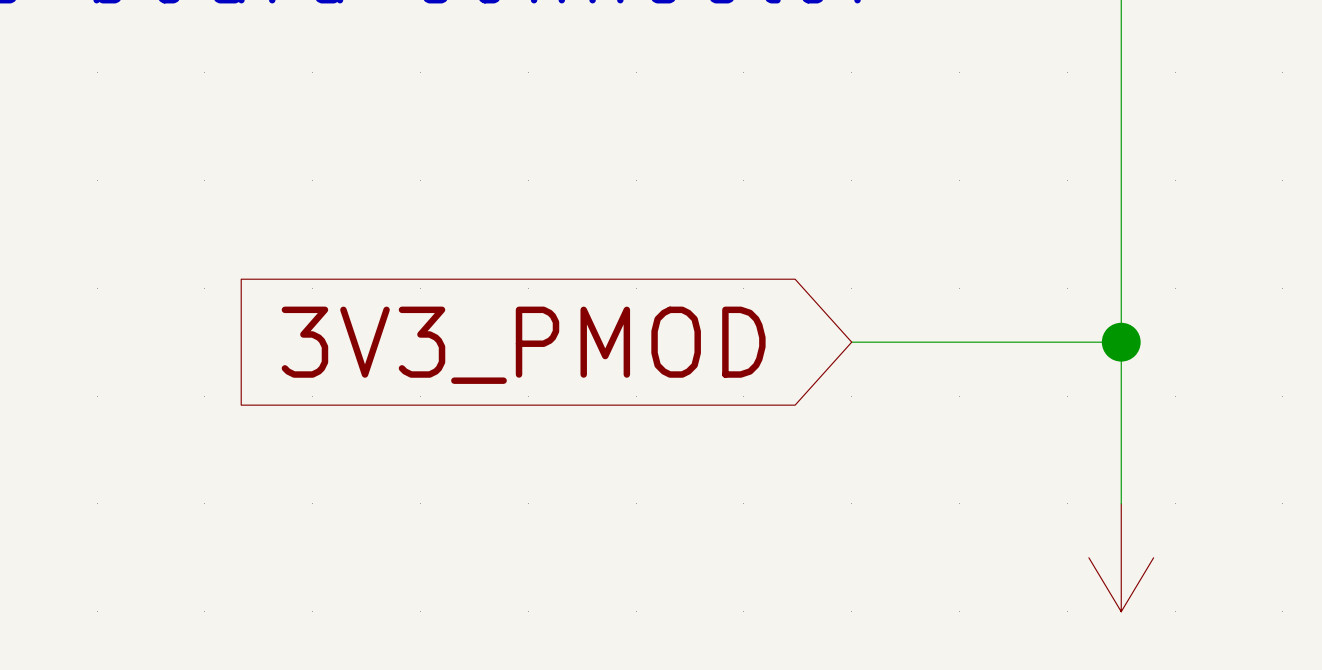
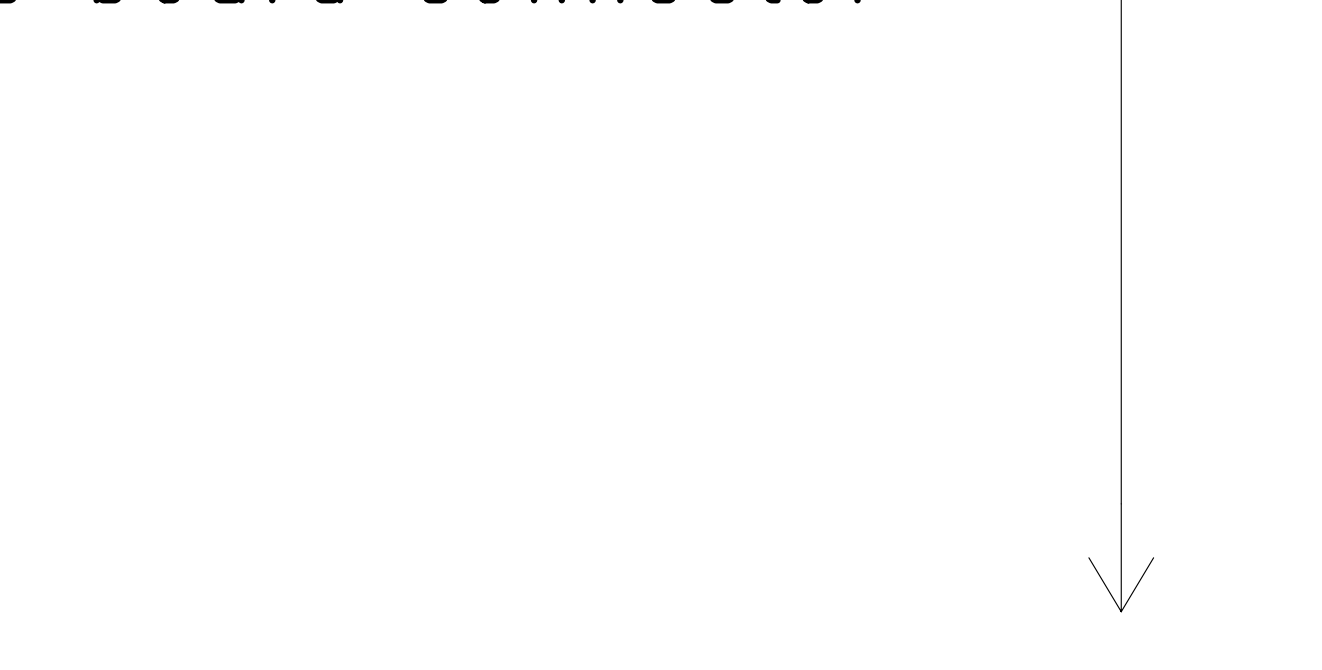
wire: (851, 342) (1121, 342) -> none
junction: (1121, 342) -> none
global label: 3V3_PMOD (523, 345) -> none

